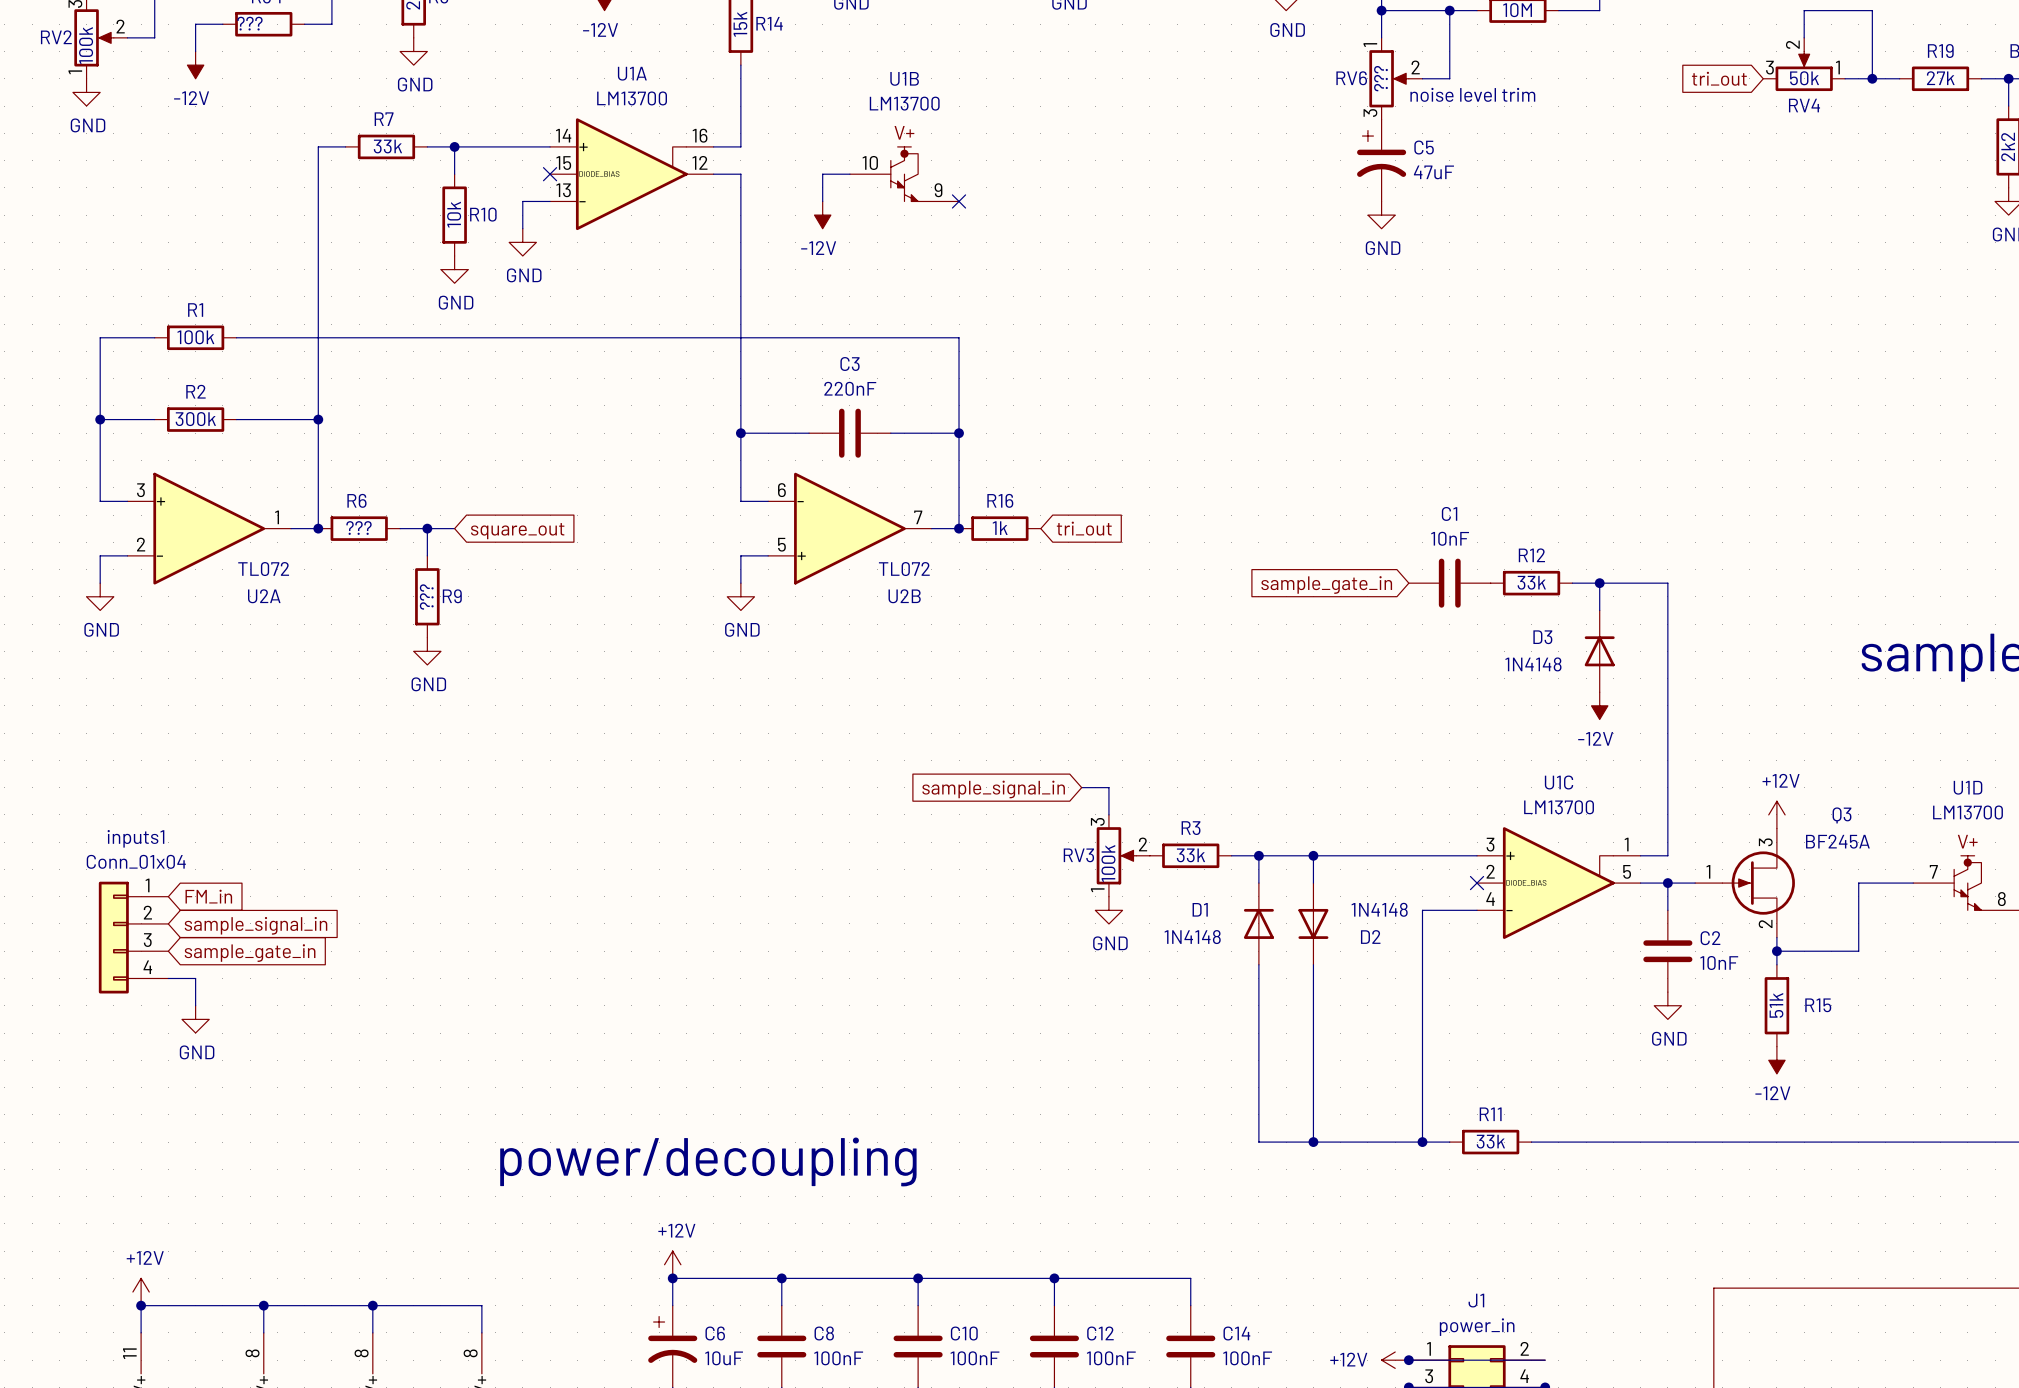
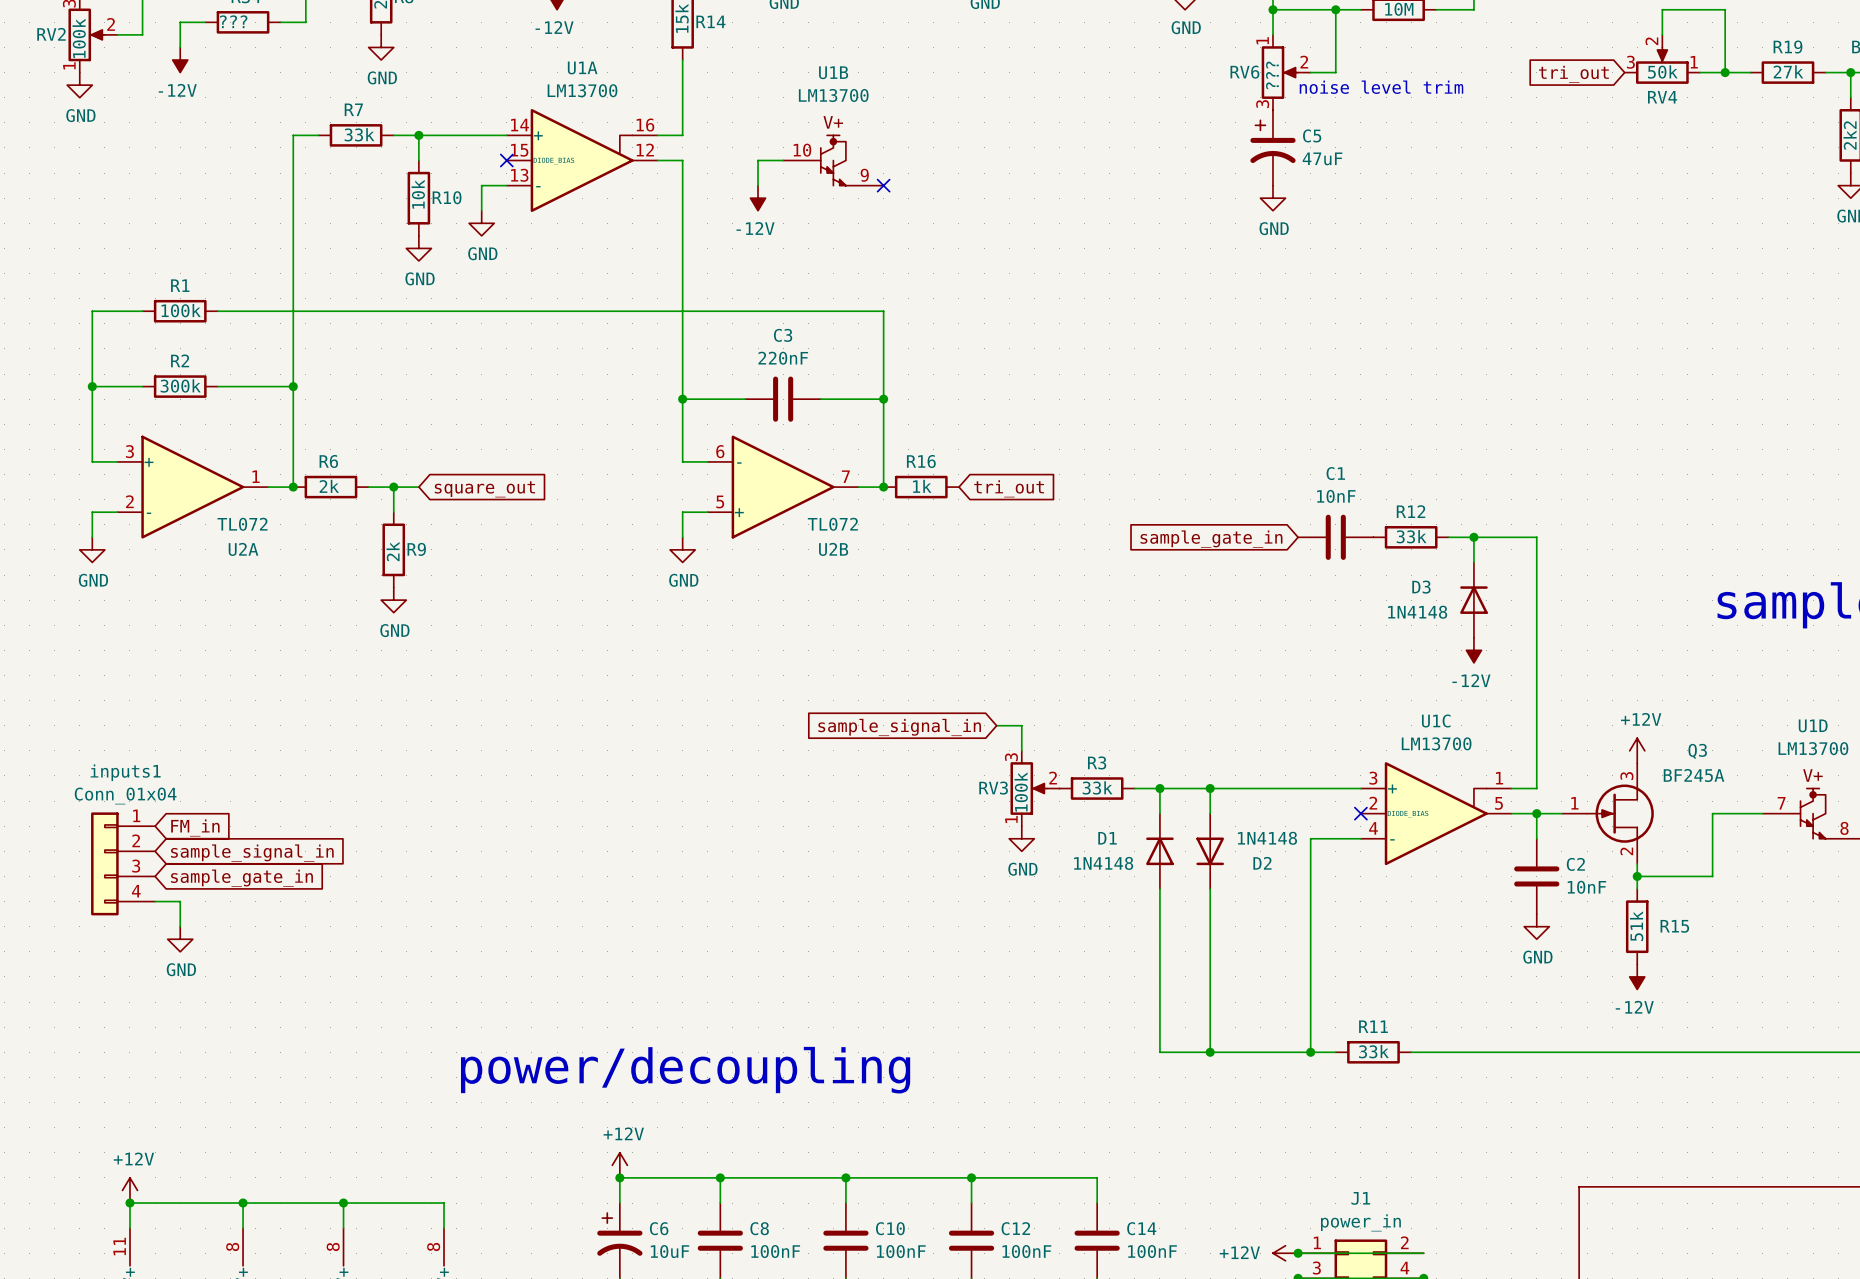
R6 value: ??? (359, 528) -> 2k (329, 486)
R9 value: ??? (426, 596) -> 2k (393, 551)

